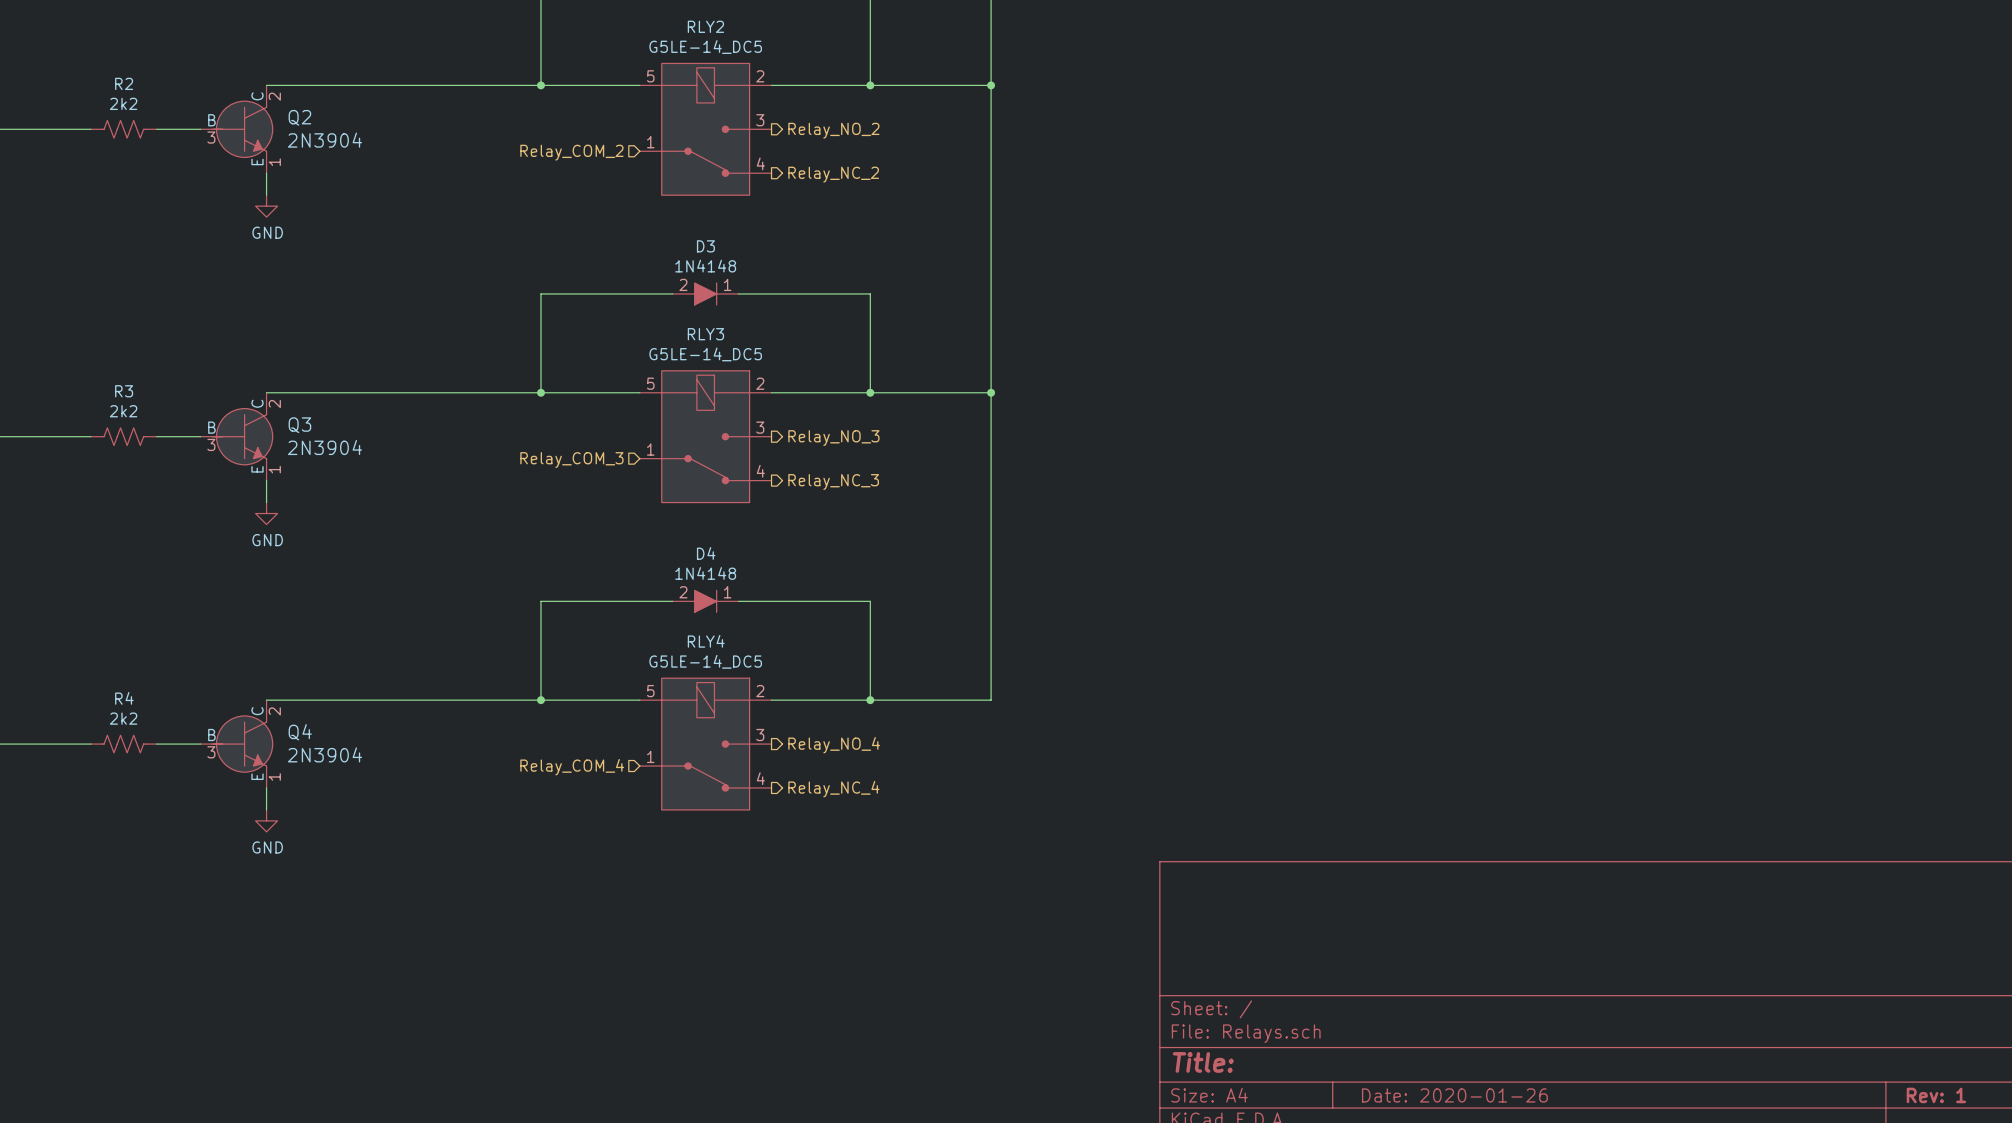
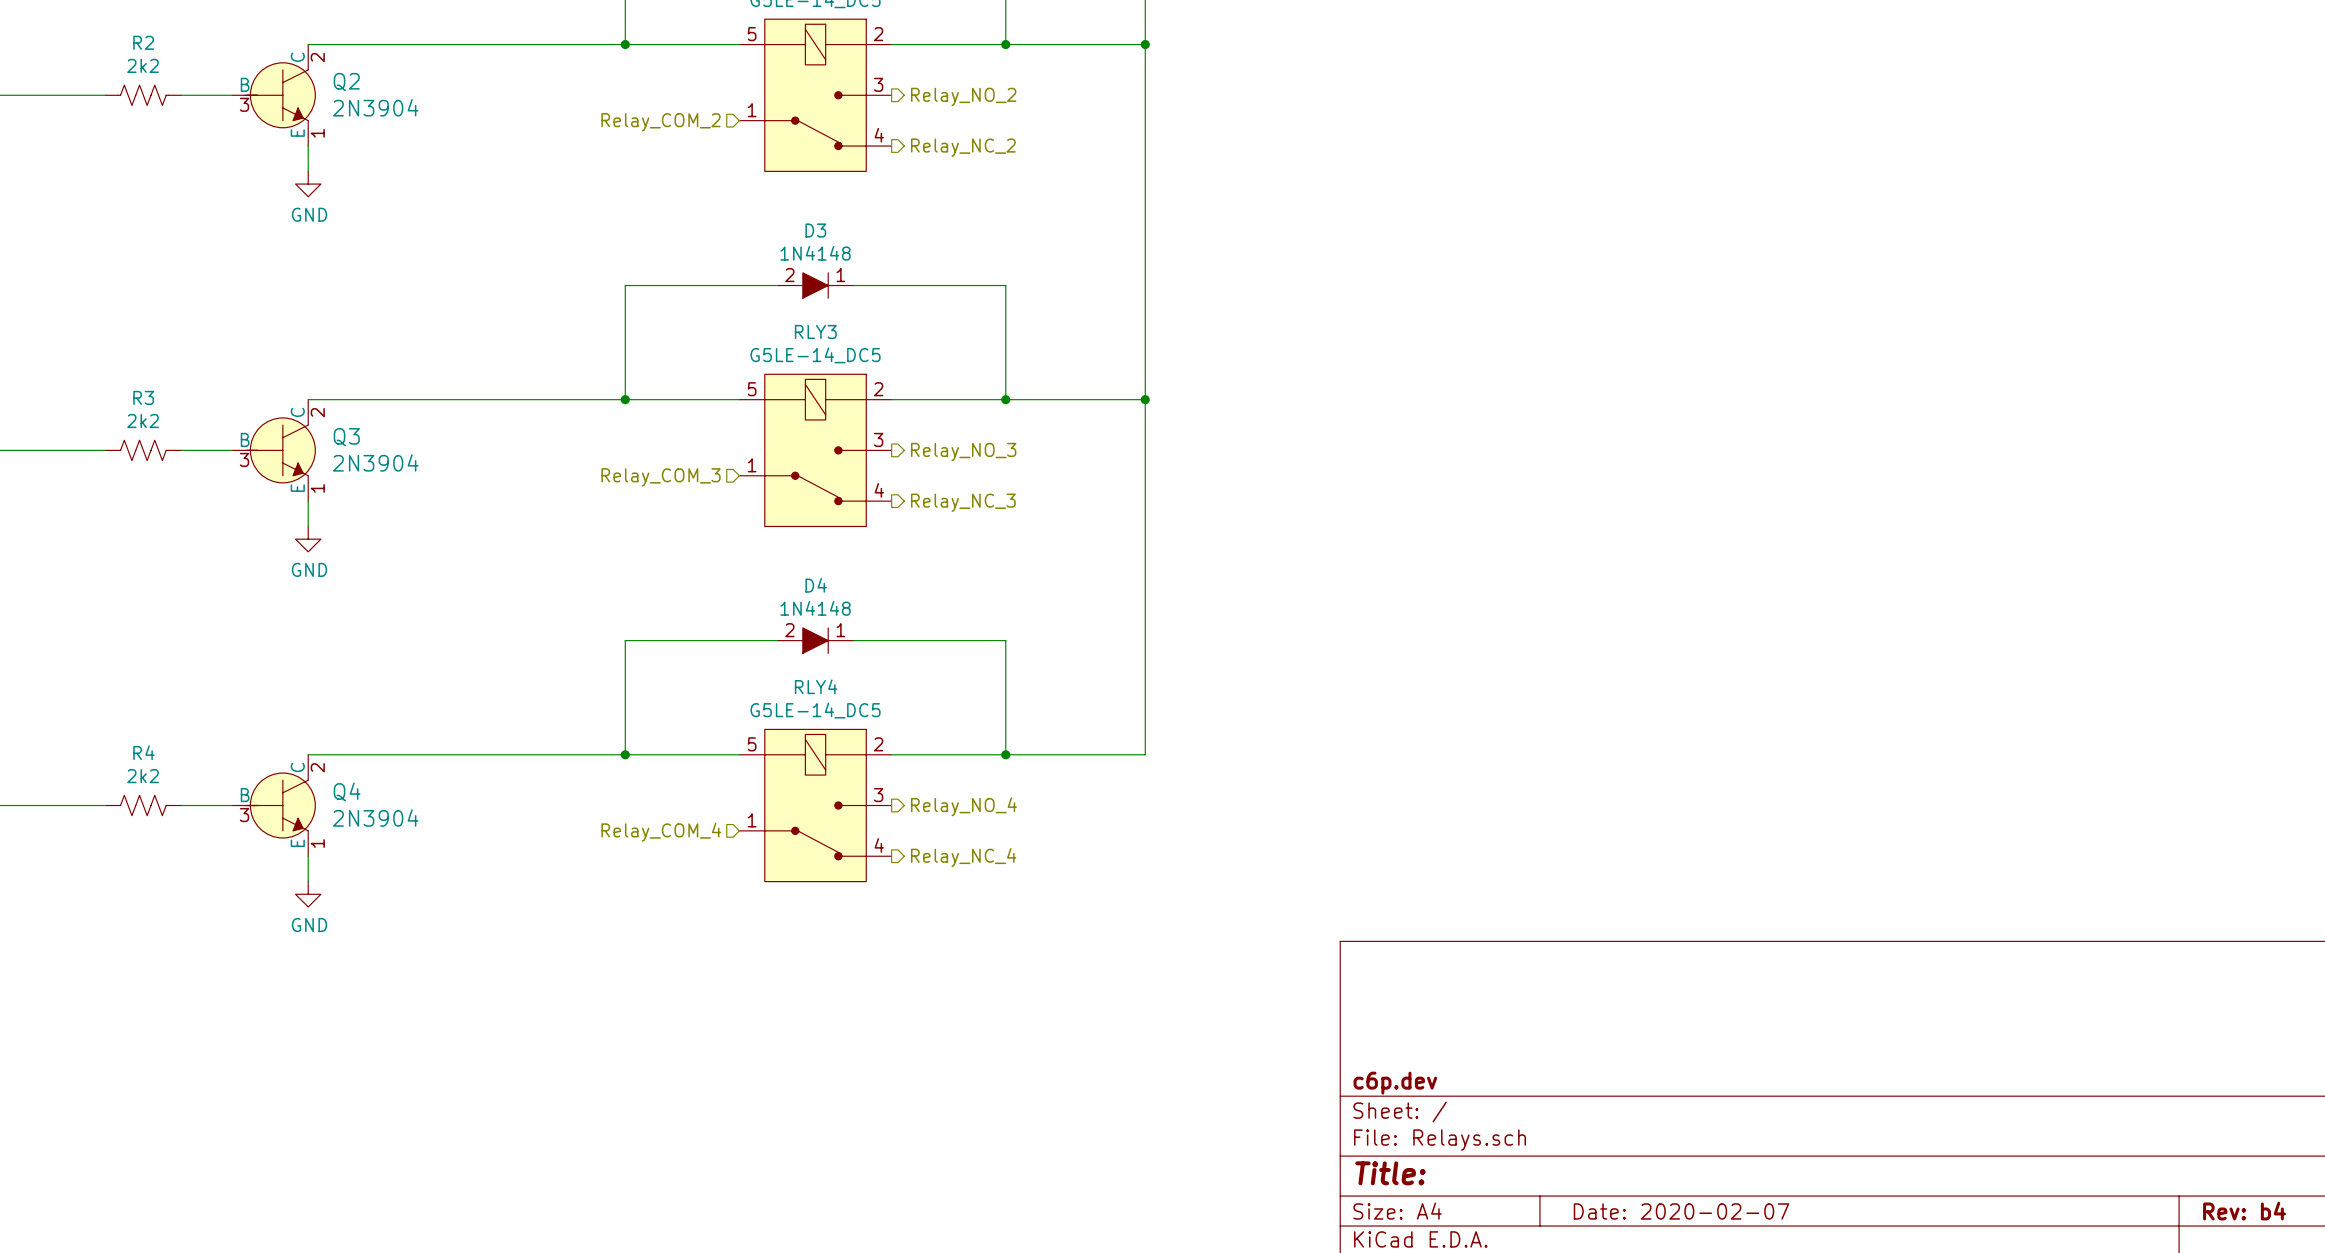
title block: none -> c6p.dev (1395, 1083)
title block: Date: 2020-01-26 (1454, 1095) -> Date: 2020-02-07 (1681, 1211)
title block: Rev: 1 (1936, 1095) -> Rev: b4 (2244, 1211)

